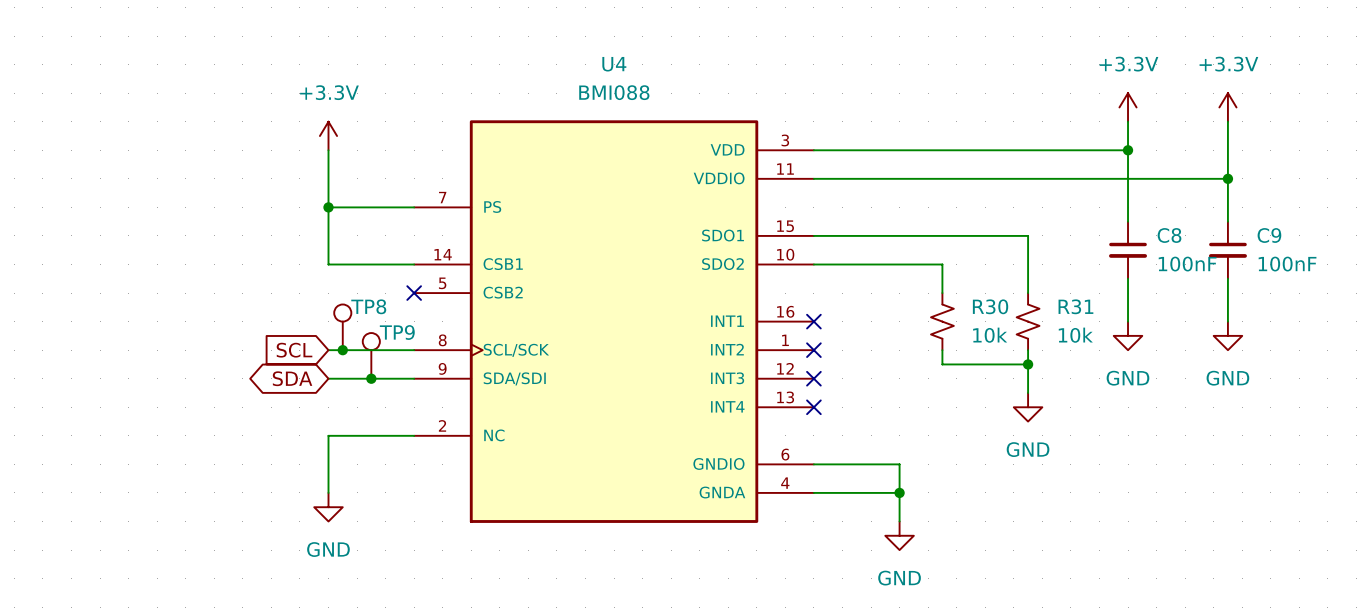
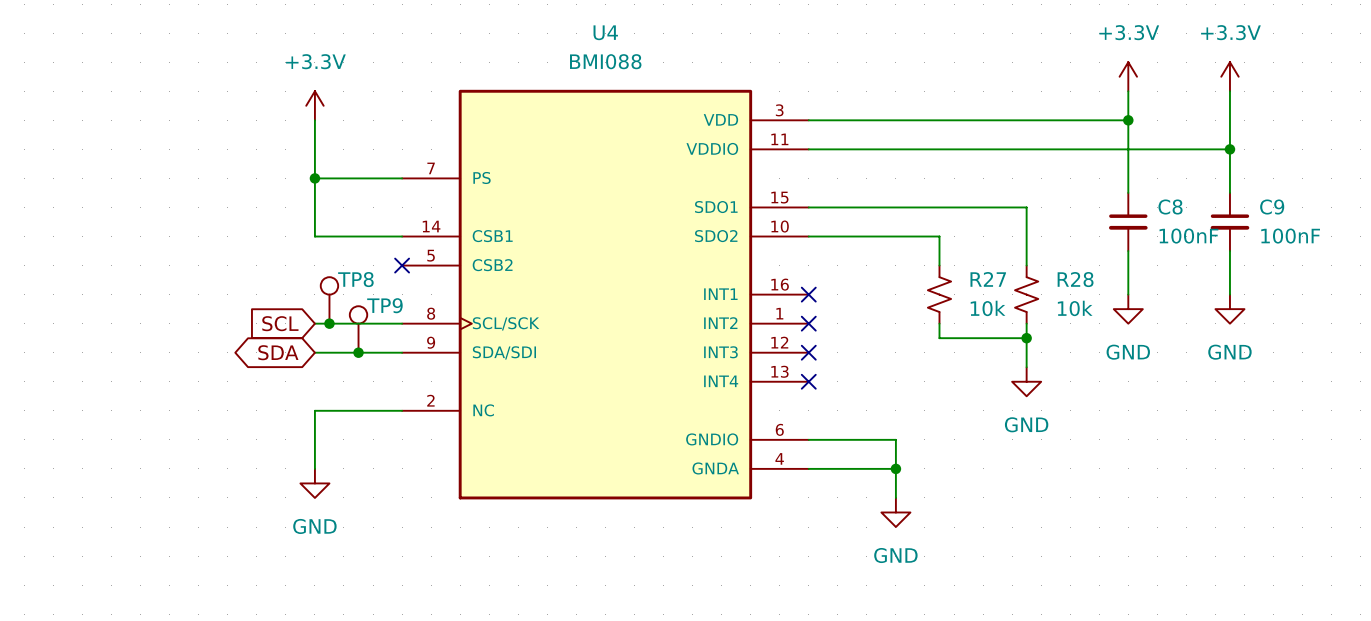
R30 name: R30 (990, 306) -> R27 (988, 279)
R31 name: R31 (1075, 306) -> R28 (1075, 279)

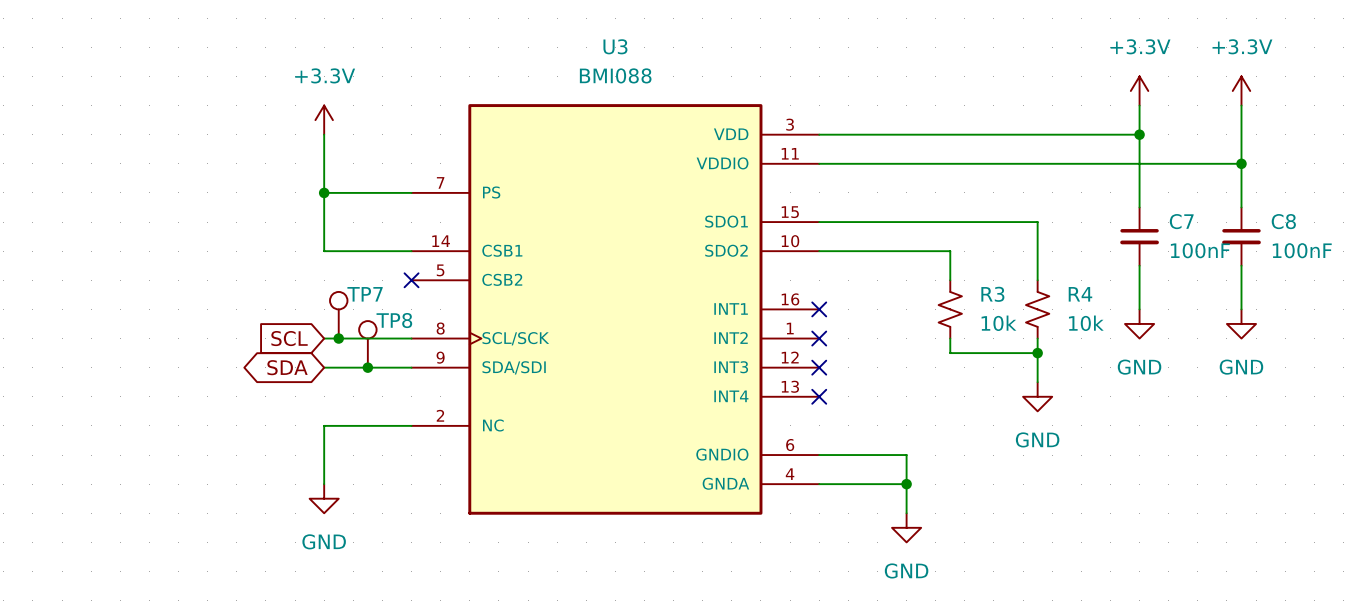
U4 name: U4 (605, 32) -> U3 (615, 46)
C8 name: C8 (1170, 207) -> C7 (1181, 221)
C9 name: C9 (1272, 207) -> C8 (1283, 221)
TP8 name: TP8 (355, 279) -> TP7 (365, 294)
R27 name: R27 (988, 279) -> R3 (992, 294)
R28 name: R28 (1075, 279) -> R4 (1080, 294)
TP9 name: TP9 (384, 305) -> TP8 (394, 320)

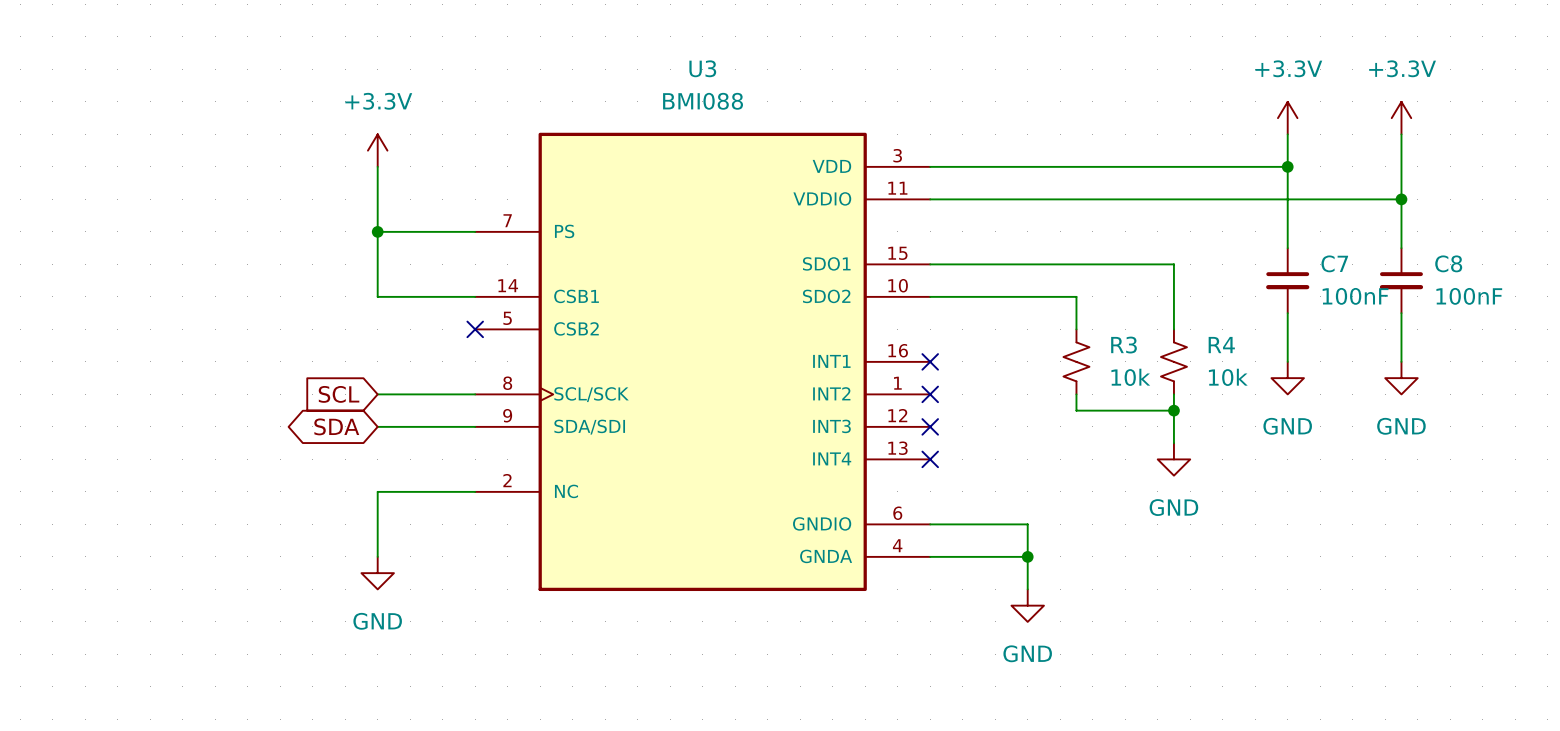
TP7: (338, 315) -> none
junction: (338, 338) -> none
TP8: (367, 344) -> none
junction: (367, 367) -> none

